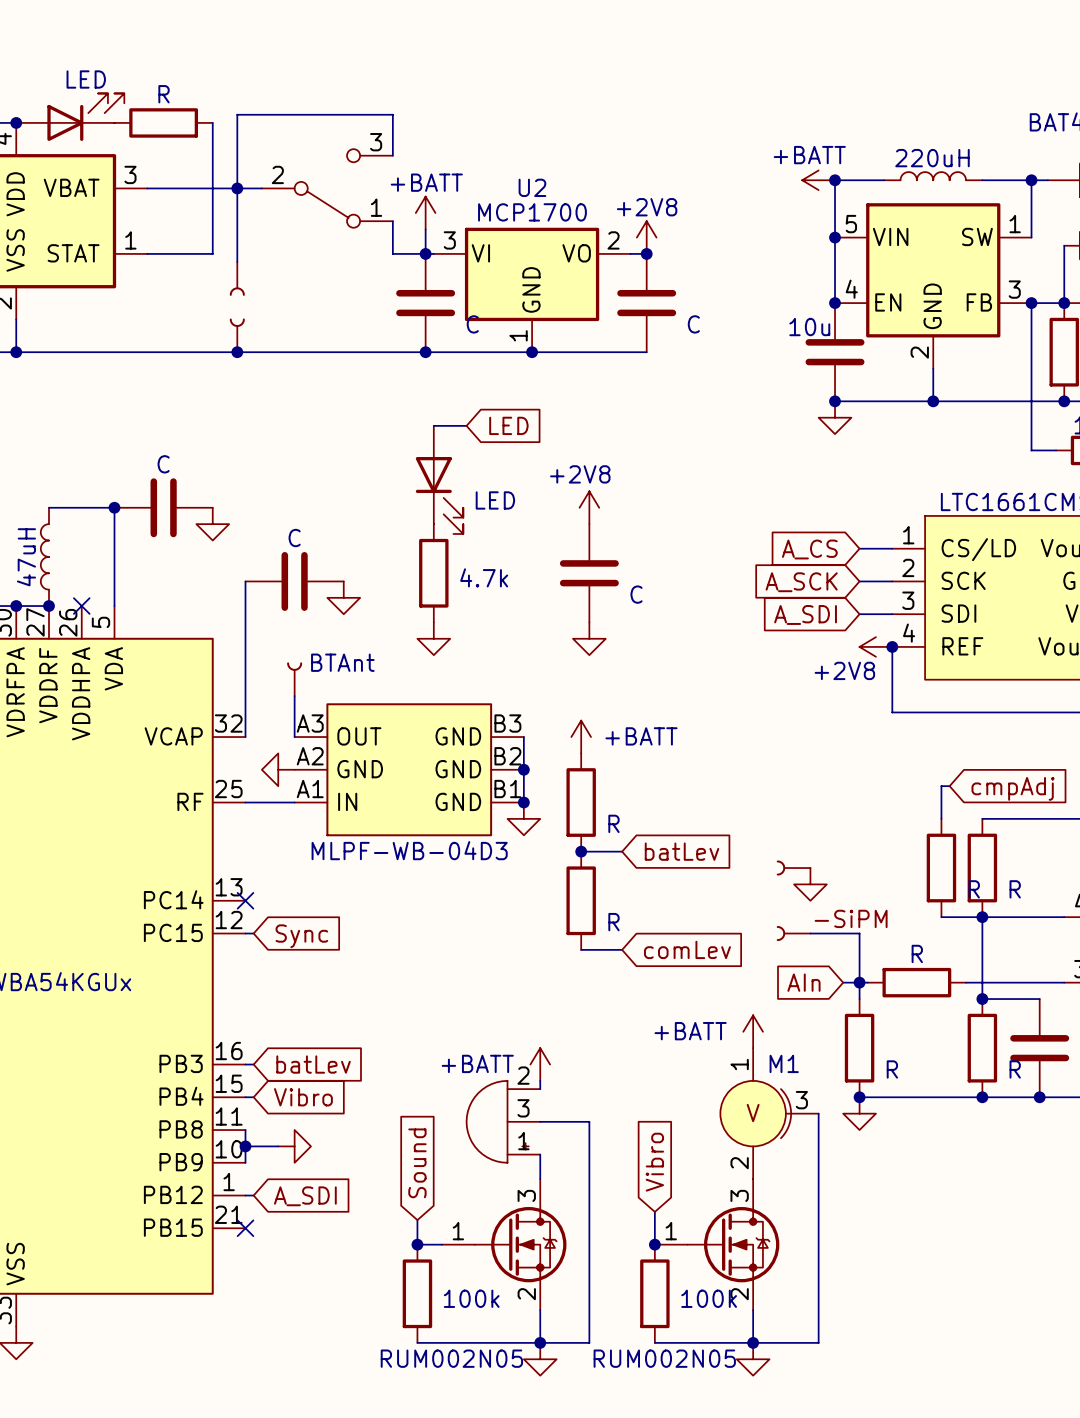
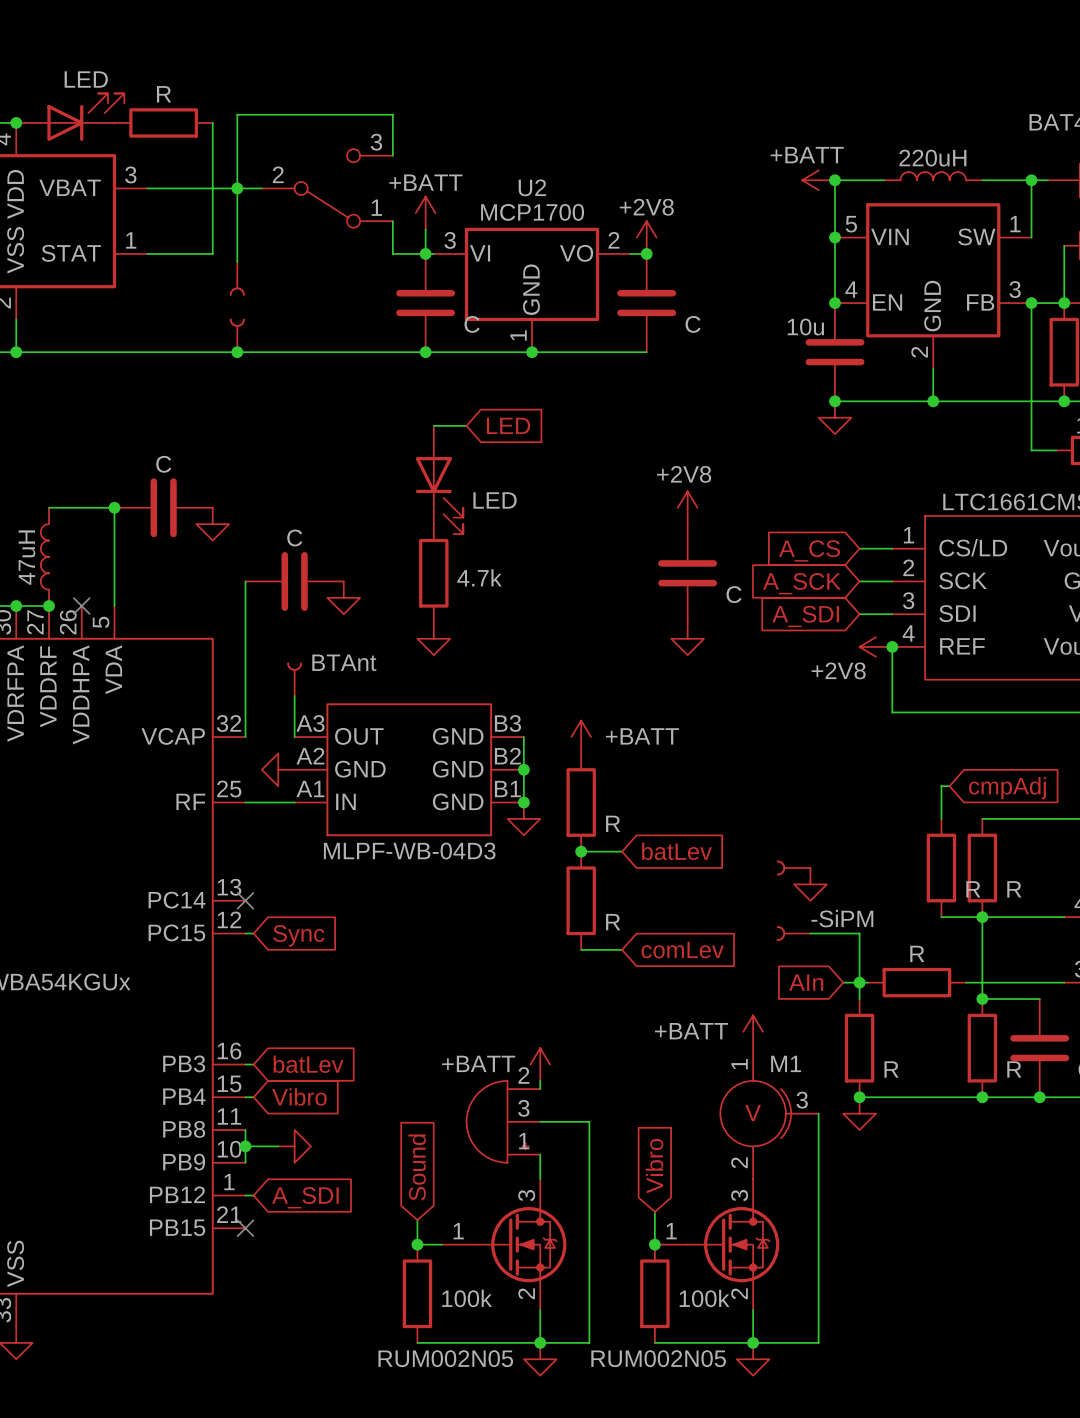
power symbol position: +2V8 (589, 507) -> +2V8 (687, 507)
part position: (589, 573) -> (687, 573)
power symbol position: (589, 638) -> (687, 638)

